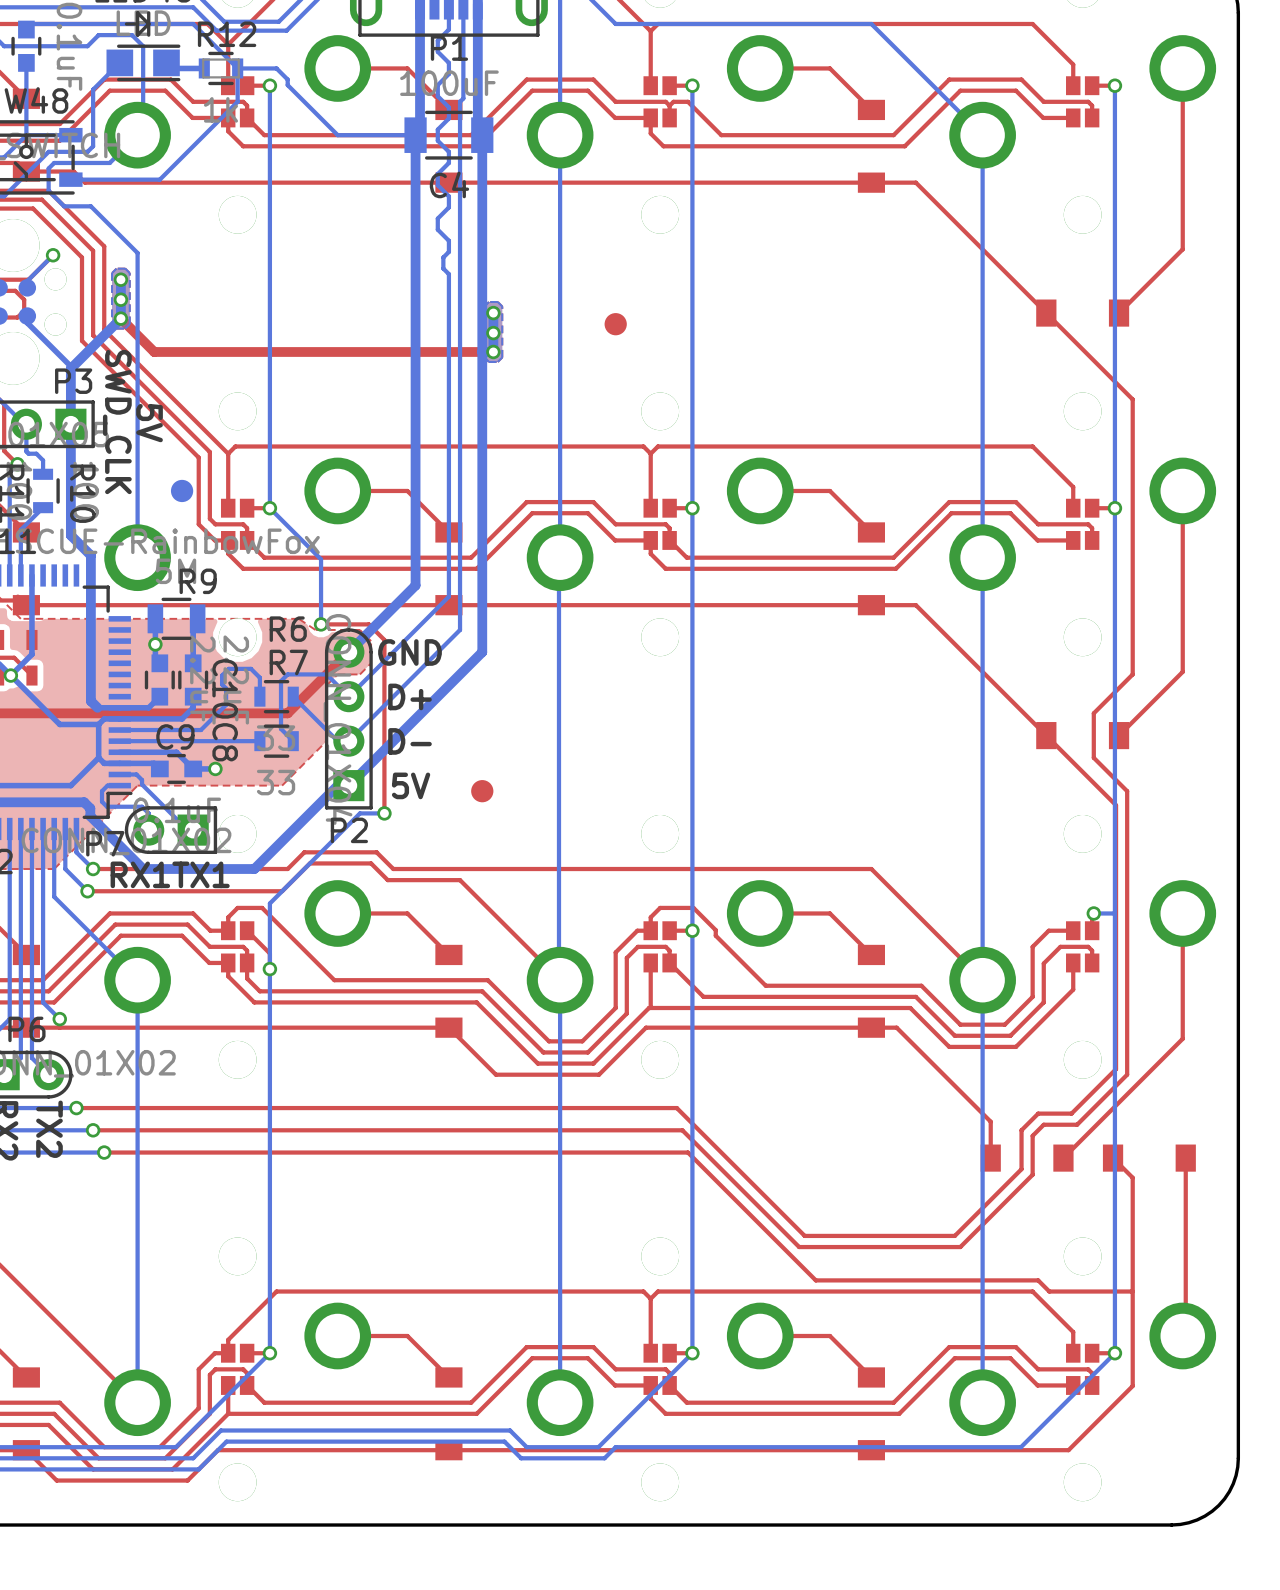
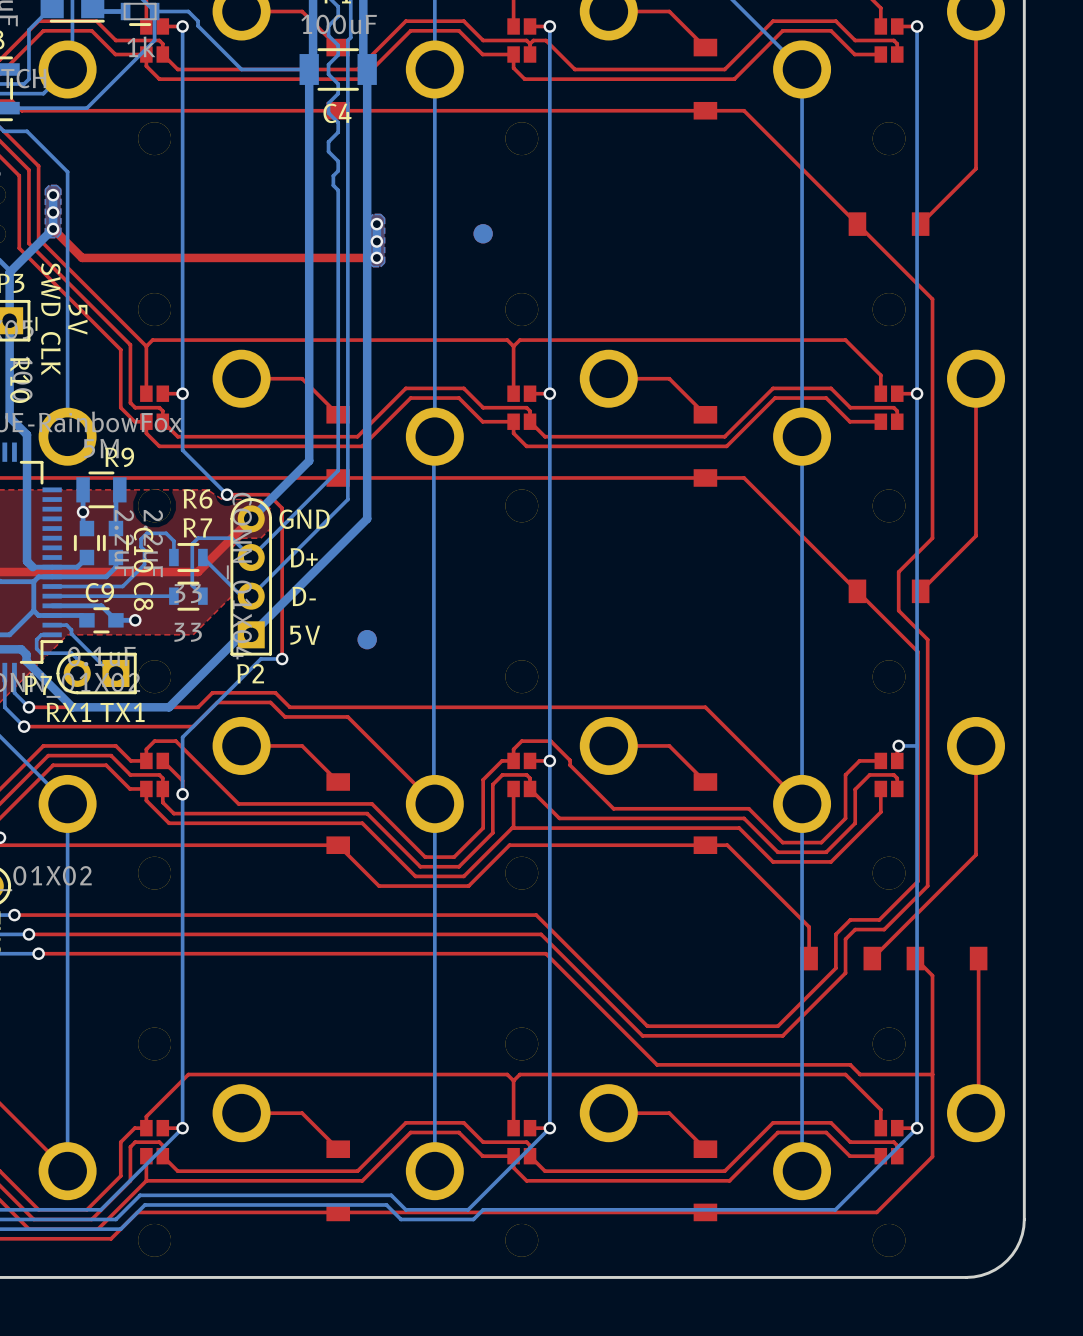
part: none -> (483, 233)
part: (182, 490) -> none
bottom track: (269, 508) (321, 559) (321, 624) -> (182, 393) (182, 450) (227, 494)
part: none -> (367, 639)

